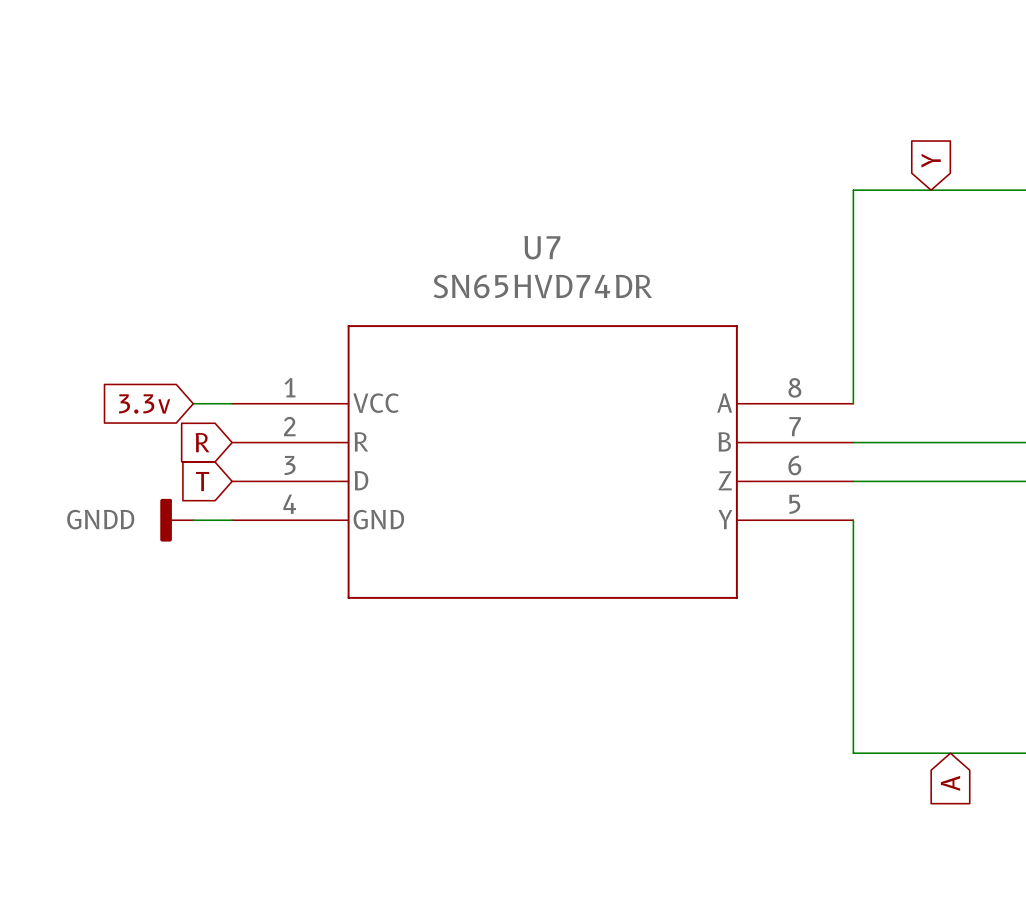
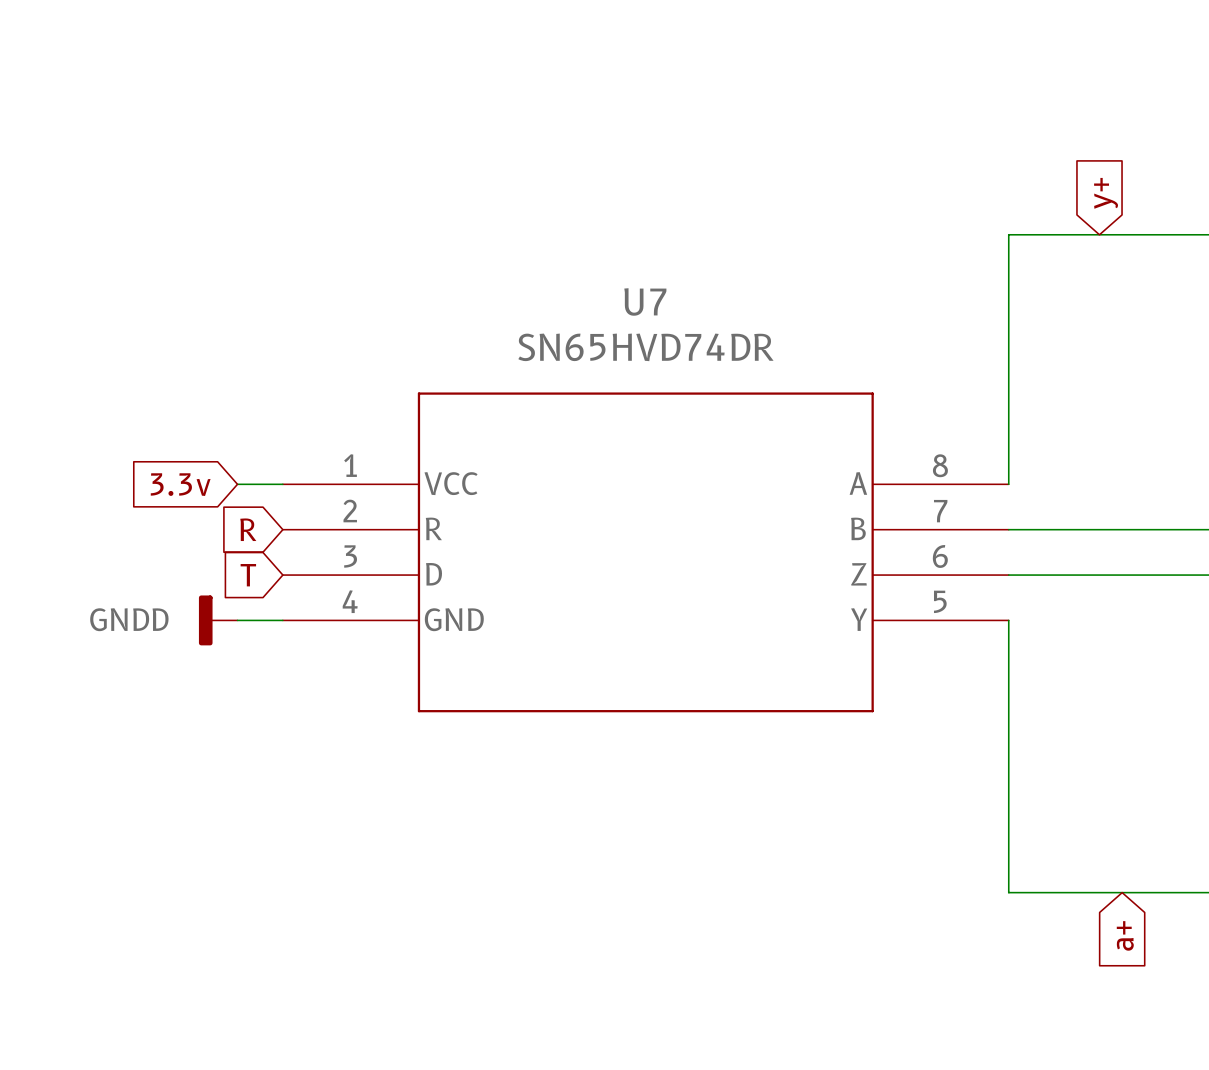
global label: Y (931, 160) -> y+ (1106, 193)
global label: A (950, 783) -> a+ (1125, 935)

